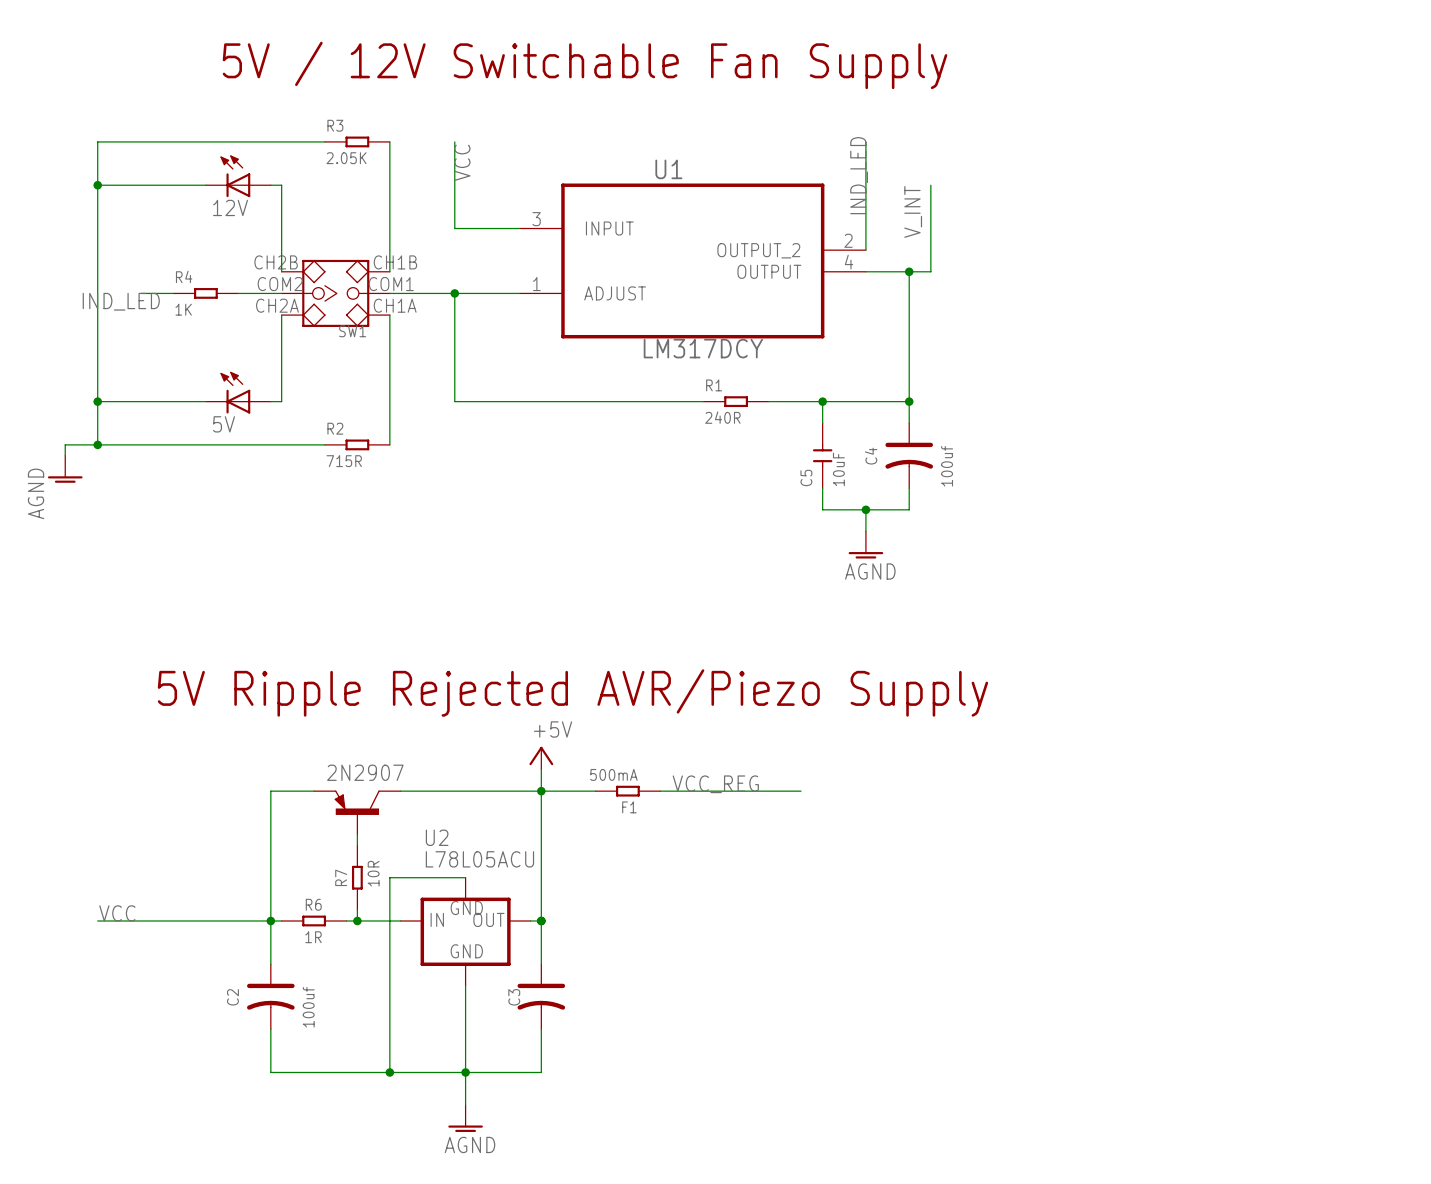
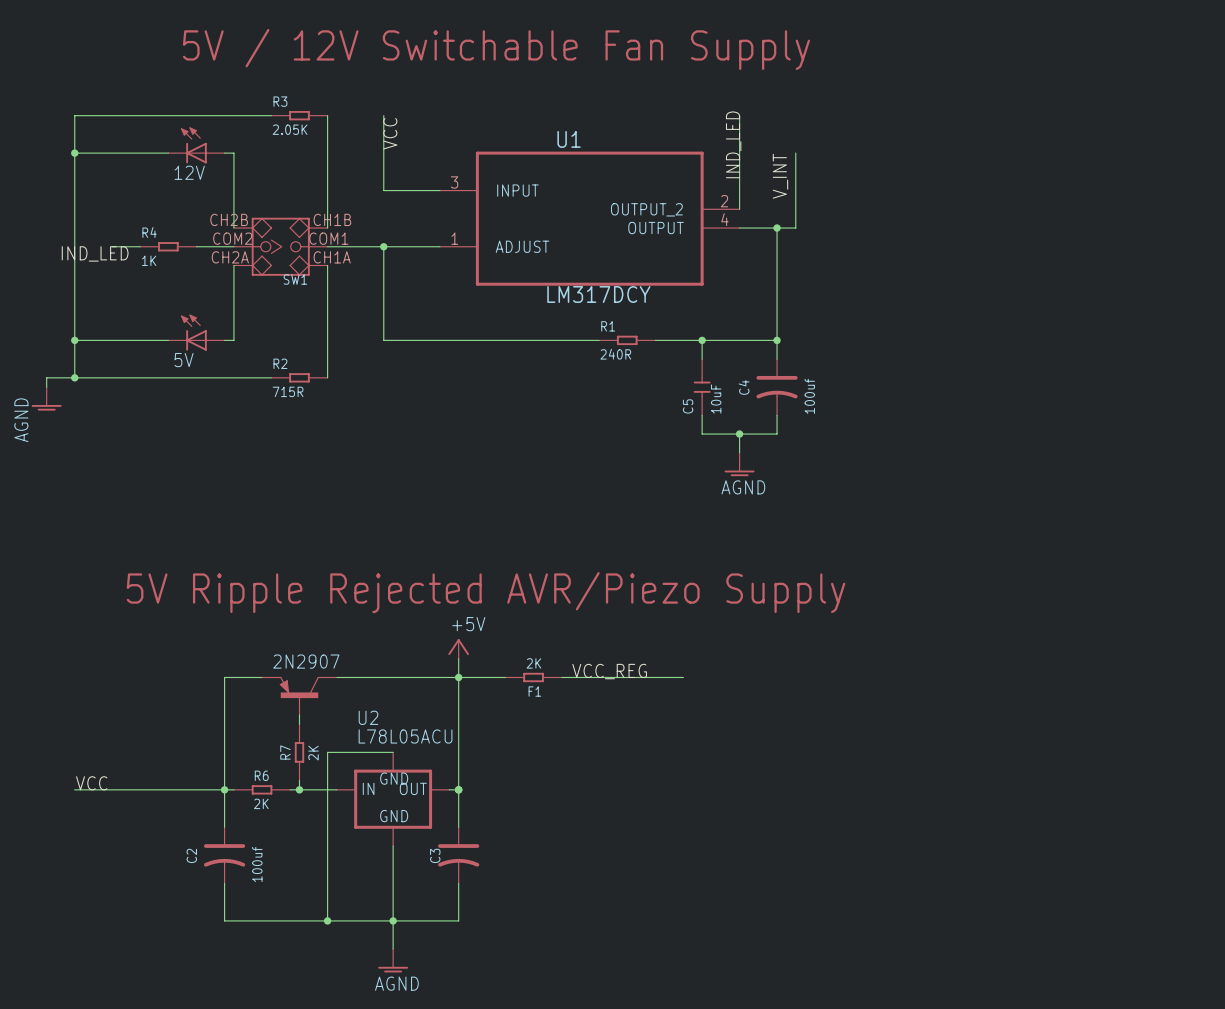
F1 value: 500mA (613, 774) -> 2K (533, 663)
R7 value: 10R (373, 873) -> 2K (313, 753)
R6 value: 1R (313, 937) -> 2K (261, 803)

